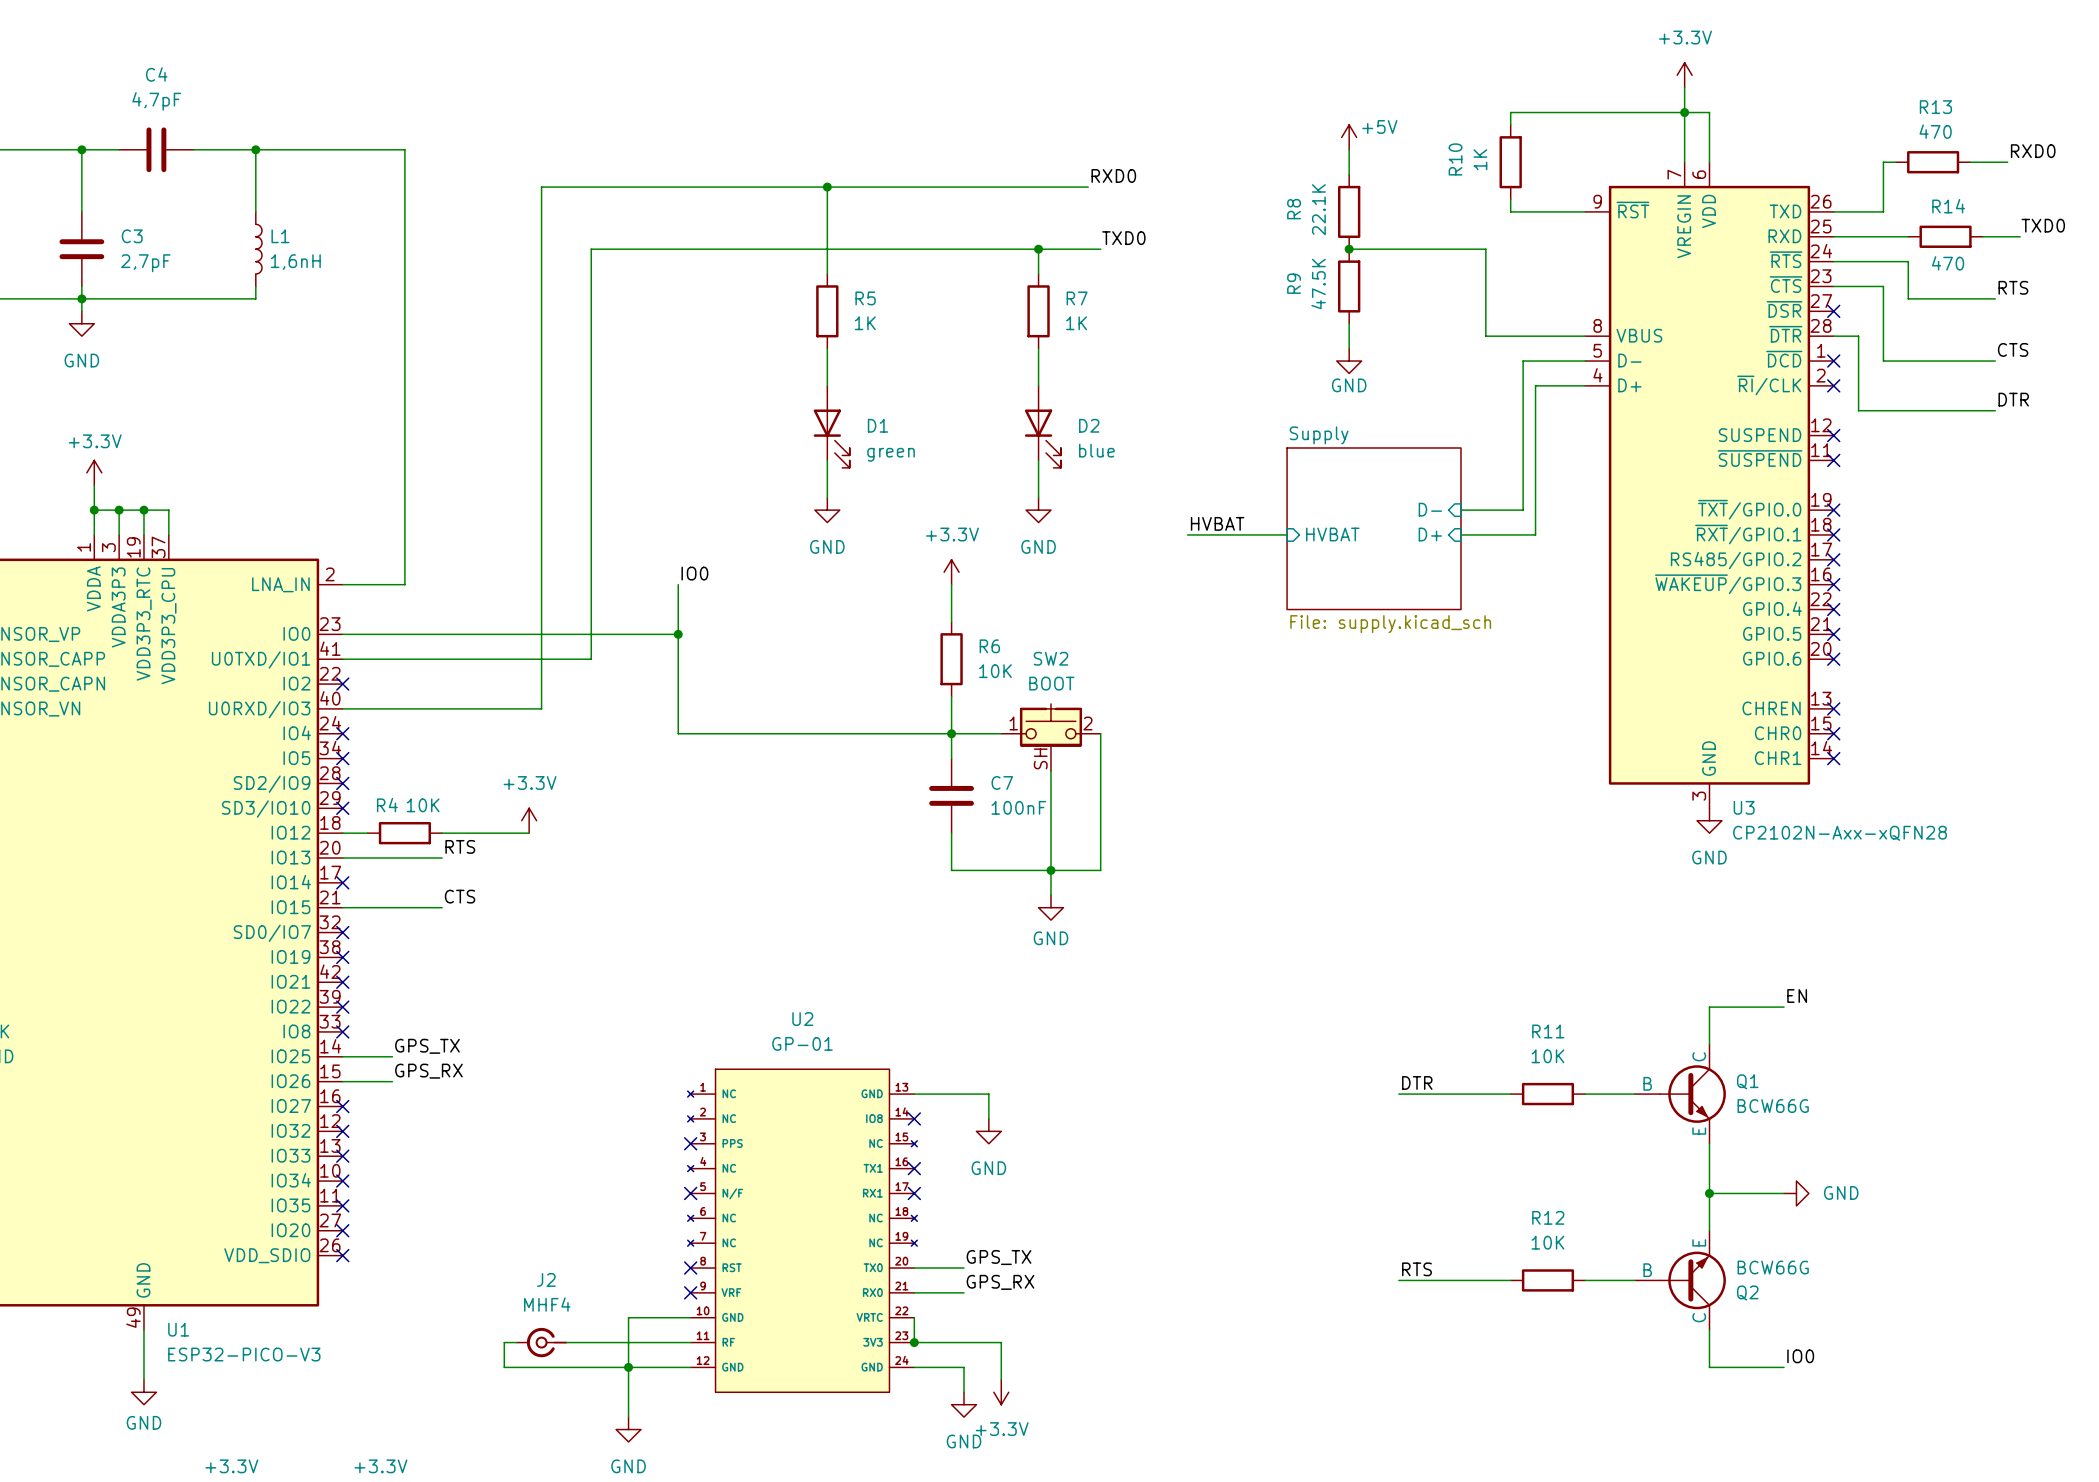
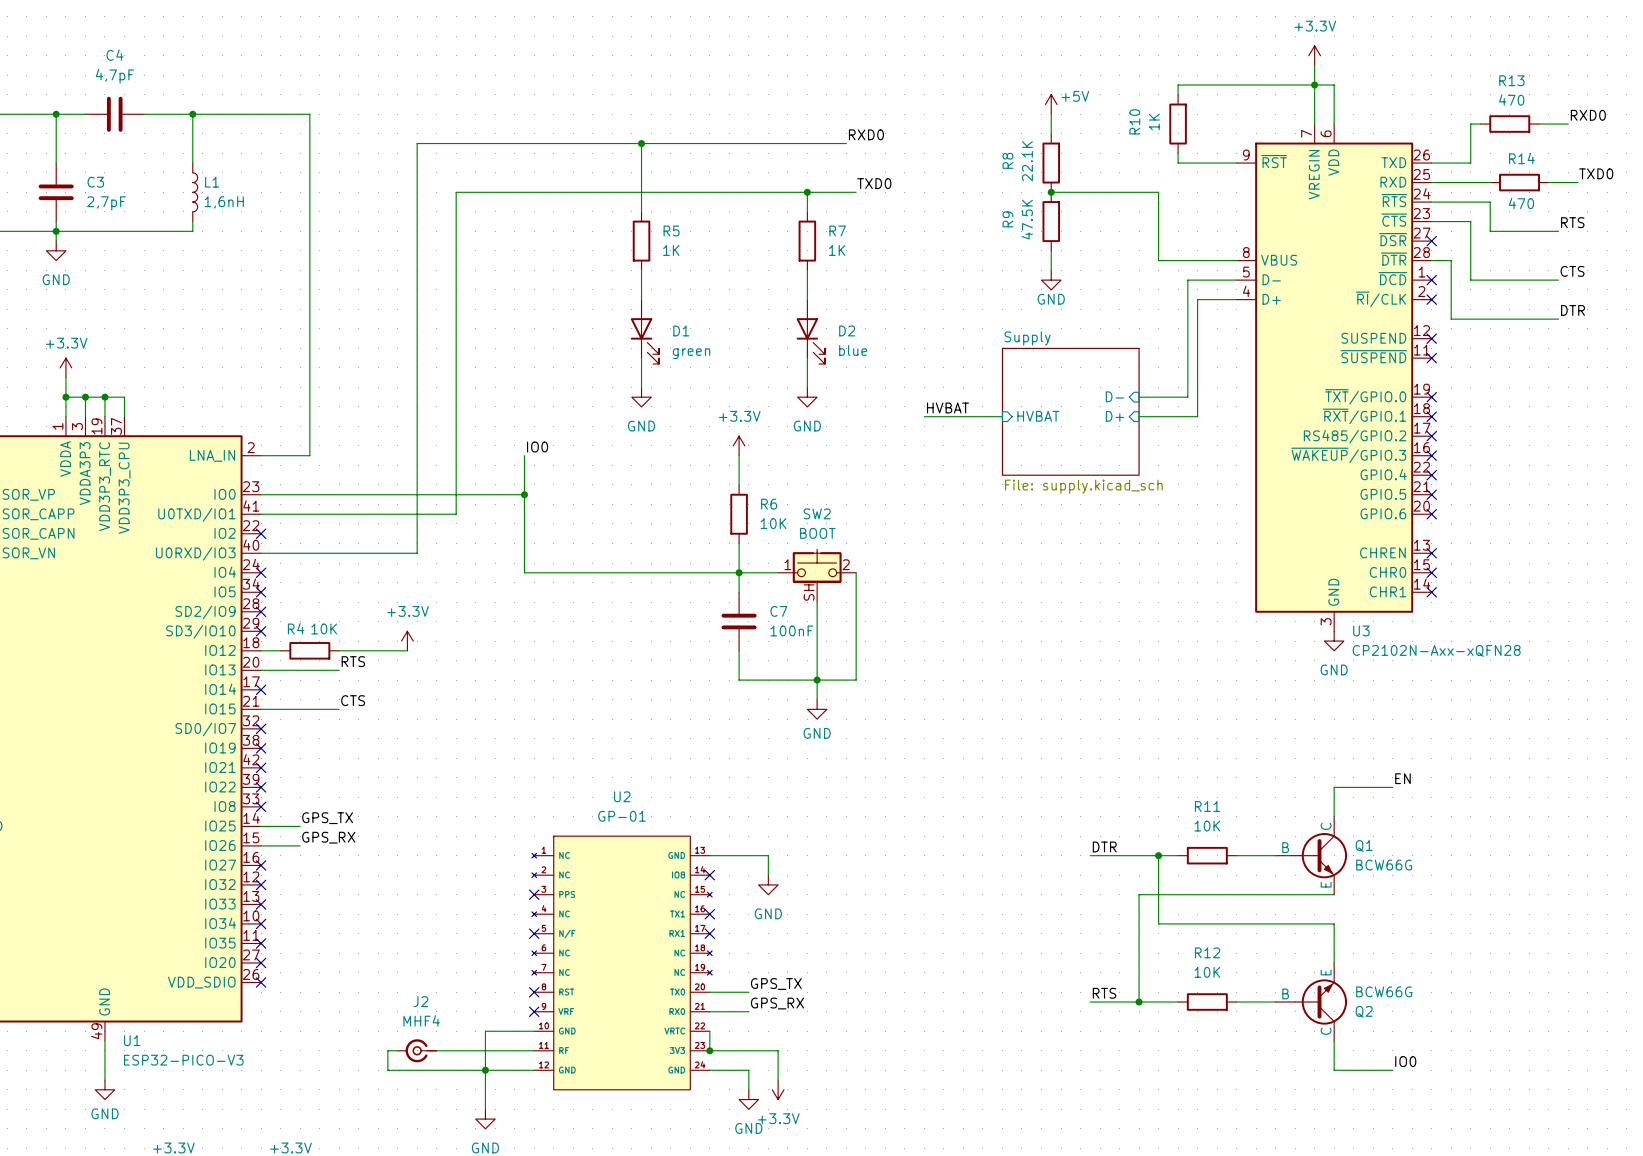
junction: none -> (1158, 855)
wire: (1709, 1143) (1709, 1181) -> (1158, 855) (1158, 923) (1334, 923)
wire: none -> (1334, 894) (1139, 894) (1139, 1002)
wire: (1709, 1193) (1784, 1193) -> none
junction: (1709, 1193) -> none
power symbol: GND (1796, 1193) -> none
junction: none -> (1139, 1002)

